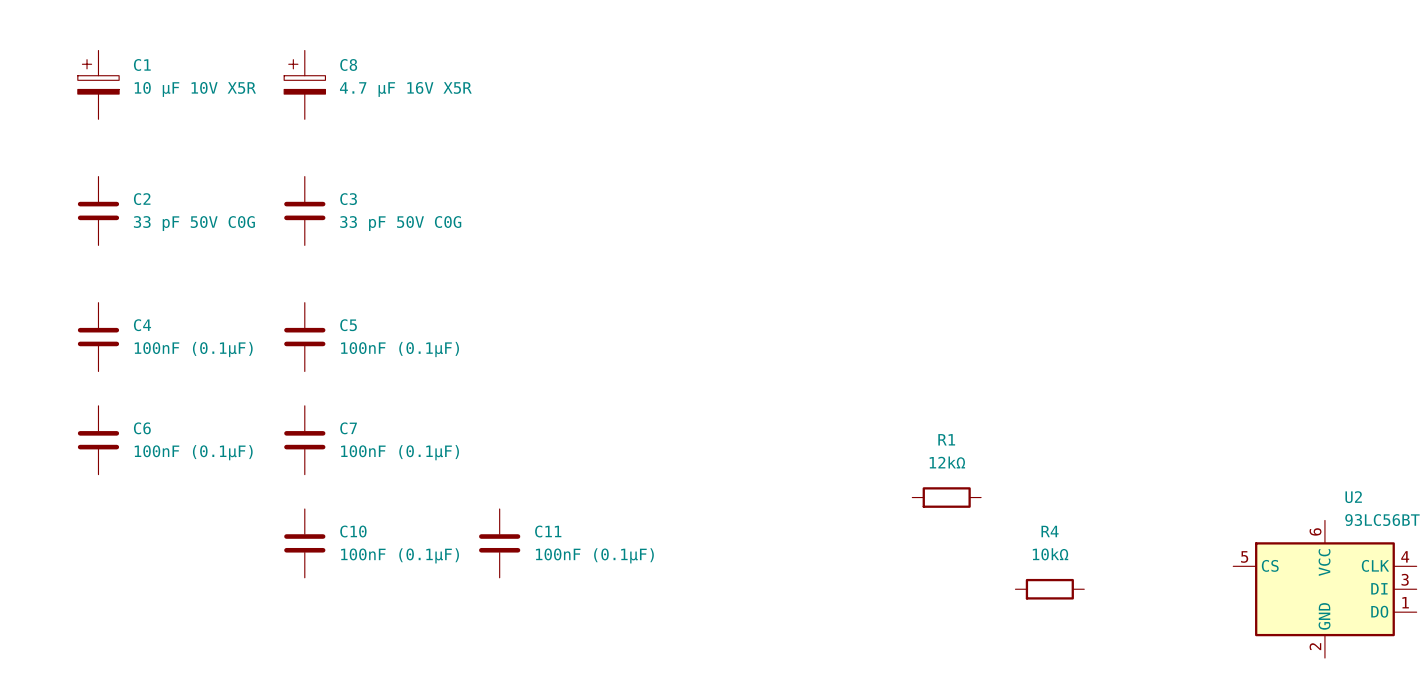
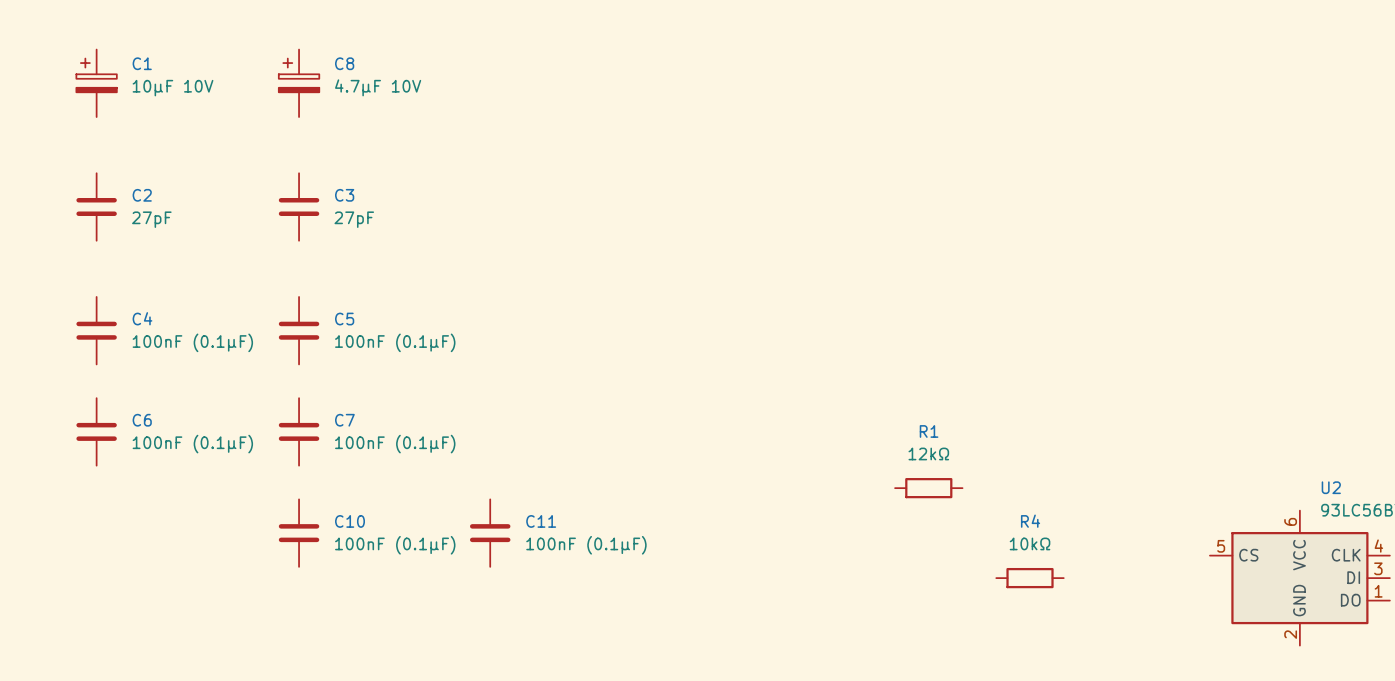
C1 value: 10 µF 10V X5R (195, 89) -> 10µF 10V (173, 88)
C8 value: 4.7 µF 16V X5R (405, 89) -> 4.7µF 10V (378, 87)
C2 value: 33 pF 50V C0G (194, 223) -> 27pF (151, 219)
C3 value: 33 pF 50V C0G (400, 223) -> 27pF (354, 219)

